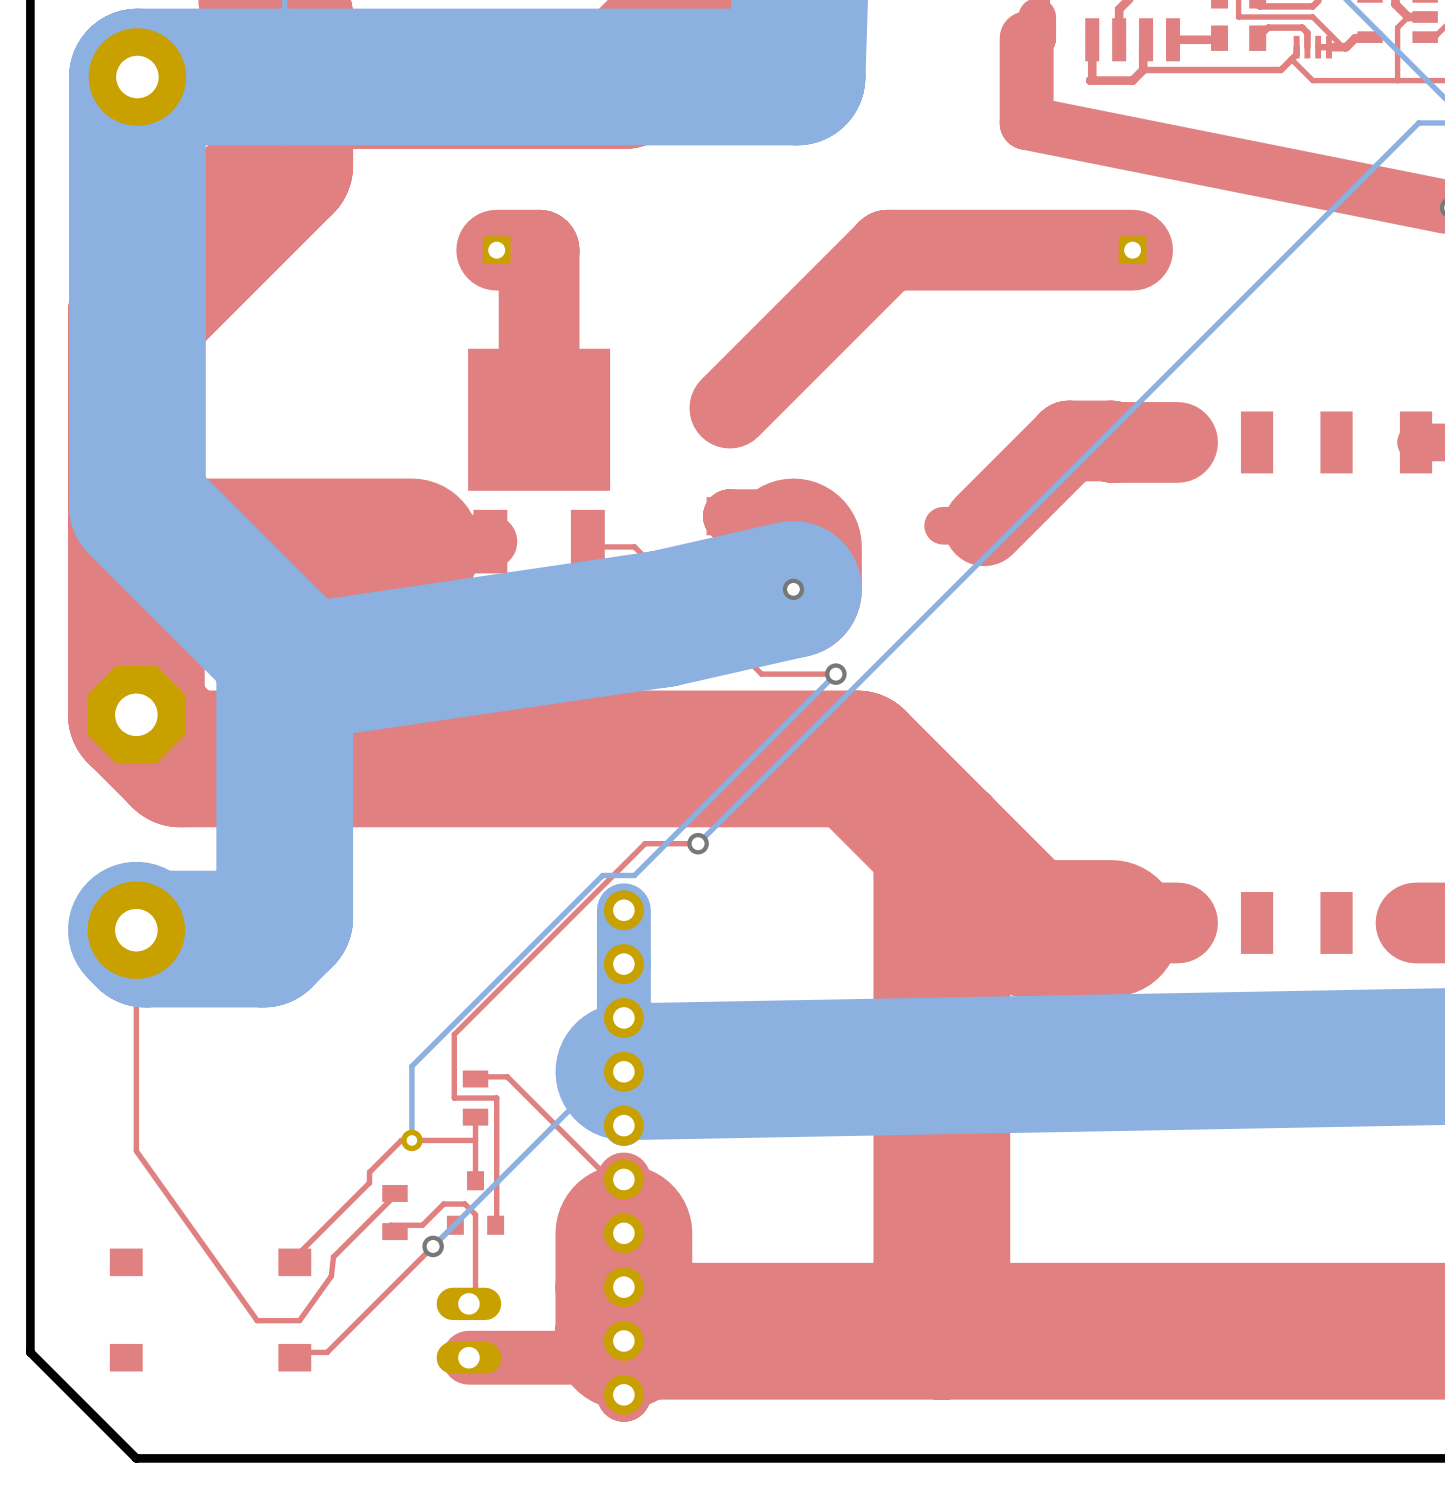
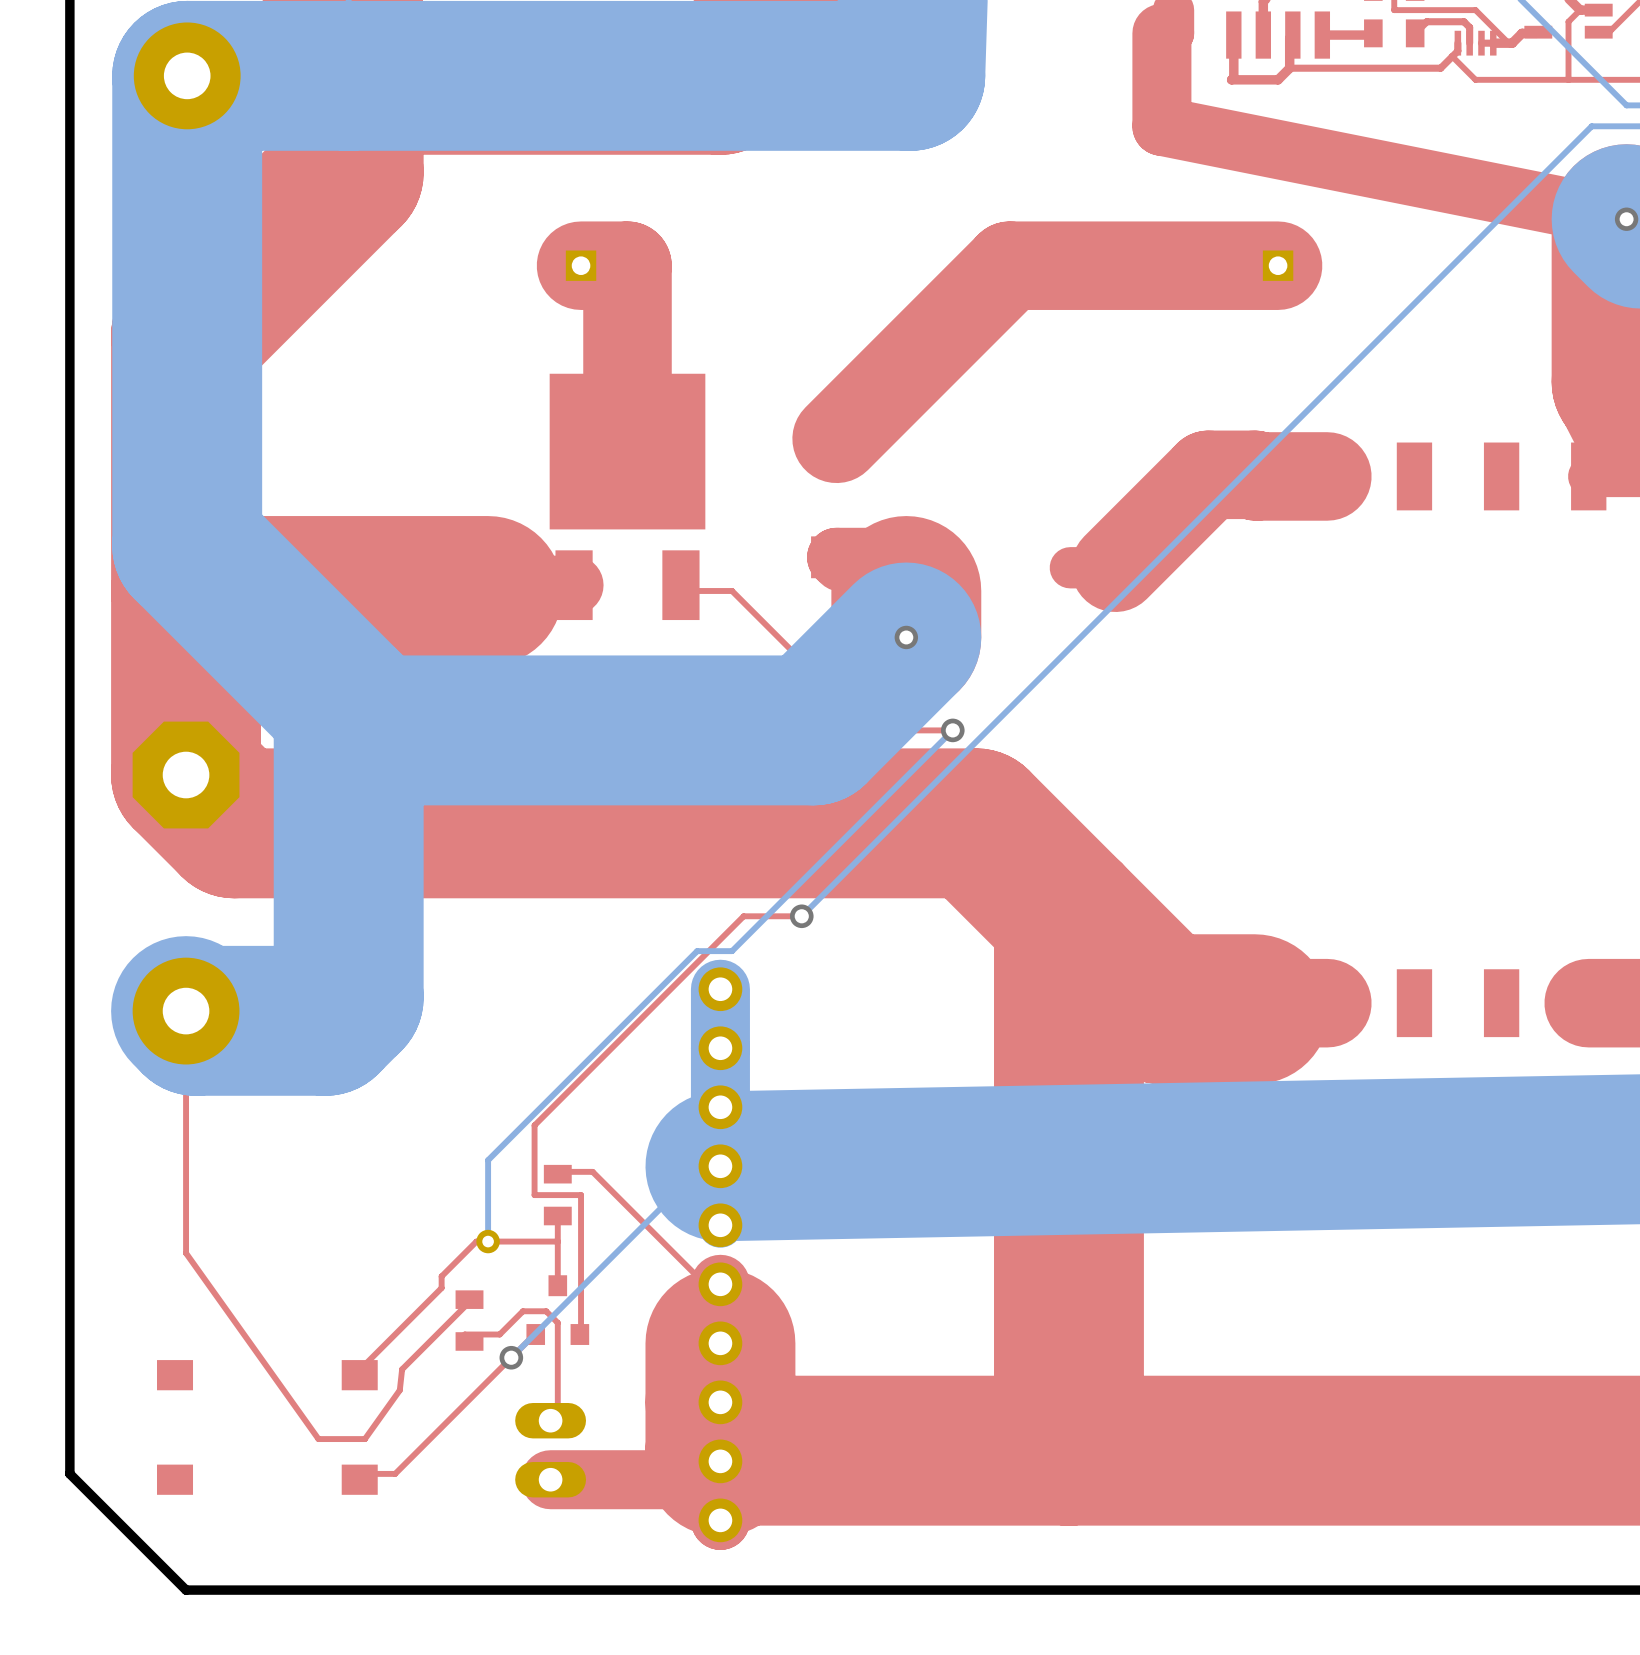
bottom track: (793, 589) (662, 619) (284, 674) -> (906, 637) (813, 730) (348, 730)

